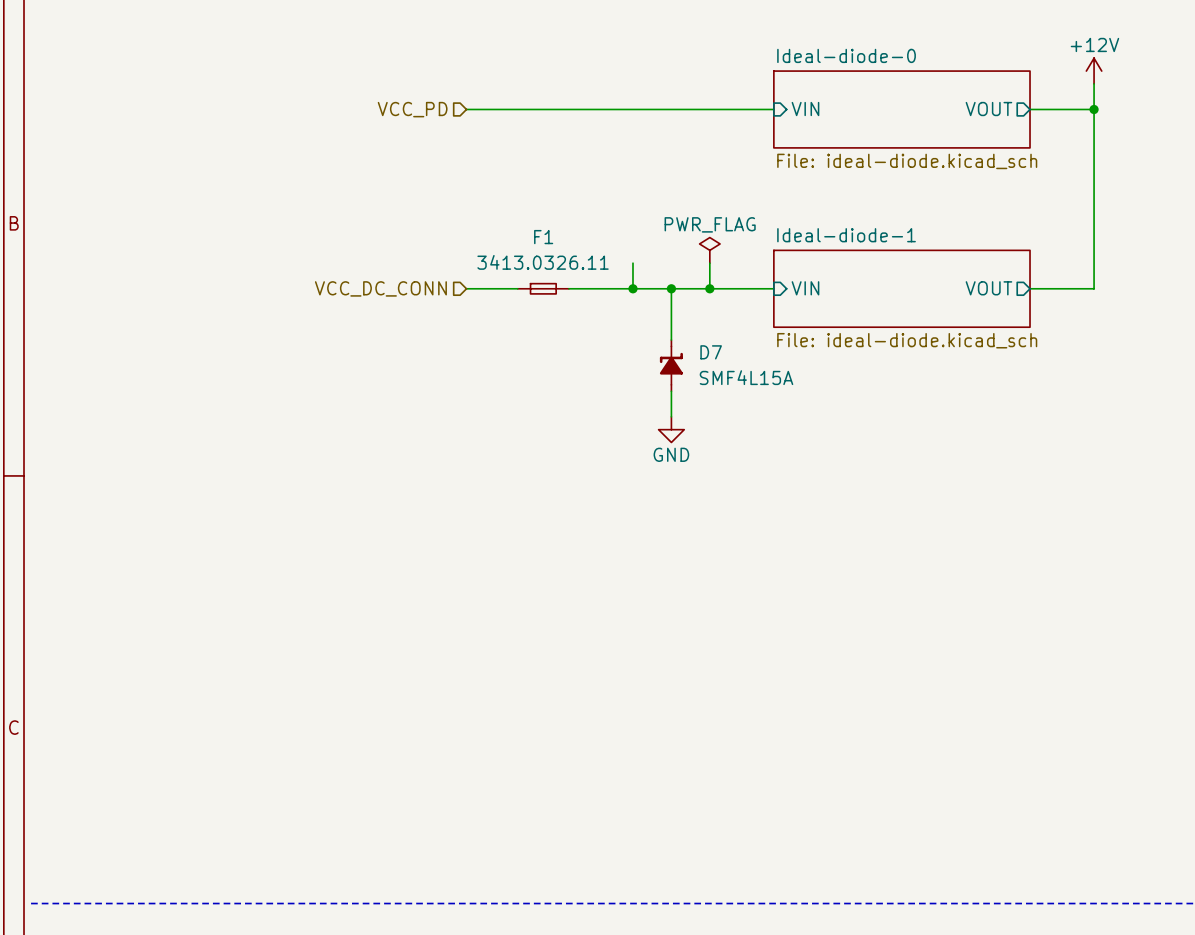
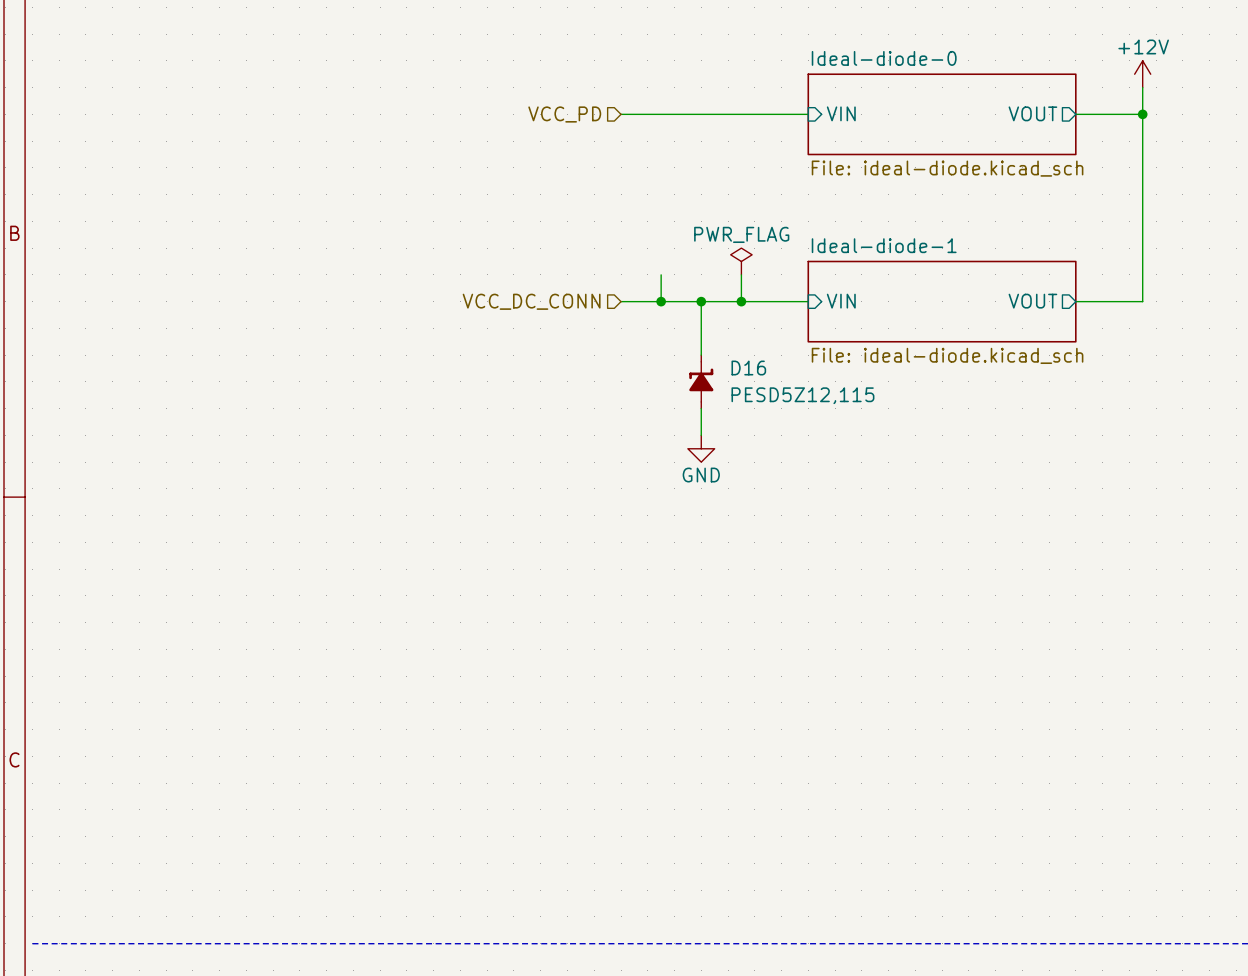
hierarchical label position: VCC_PD (412, 109) -> VCC_PD (564, 114)
wire: (466, 109) (594, 109) -> none
hierarchical label position: VCC_DC_CONN (380, 288) -> VCC_DC_CONN (531, 301)
wire: (466, 288) (517, 288) -> none
F1: (543, 288) -> none
wire: (568, 288) (594, 288) -> none
D7 name: D7 (711, 352) -> D16 (748, 368)
D7 text: SMF4L15A (746, 377) -> PESD5Z12,115 (802, 395)

